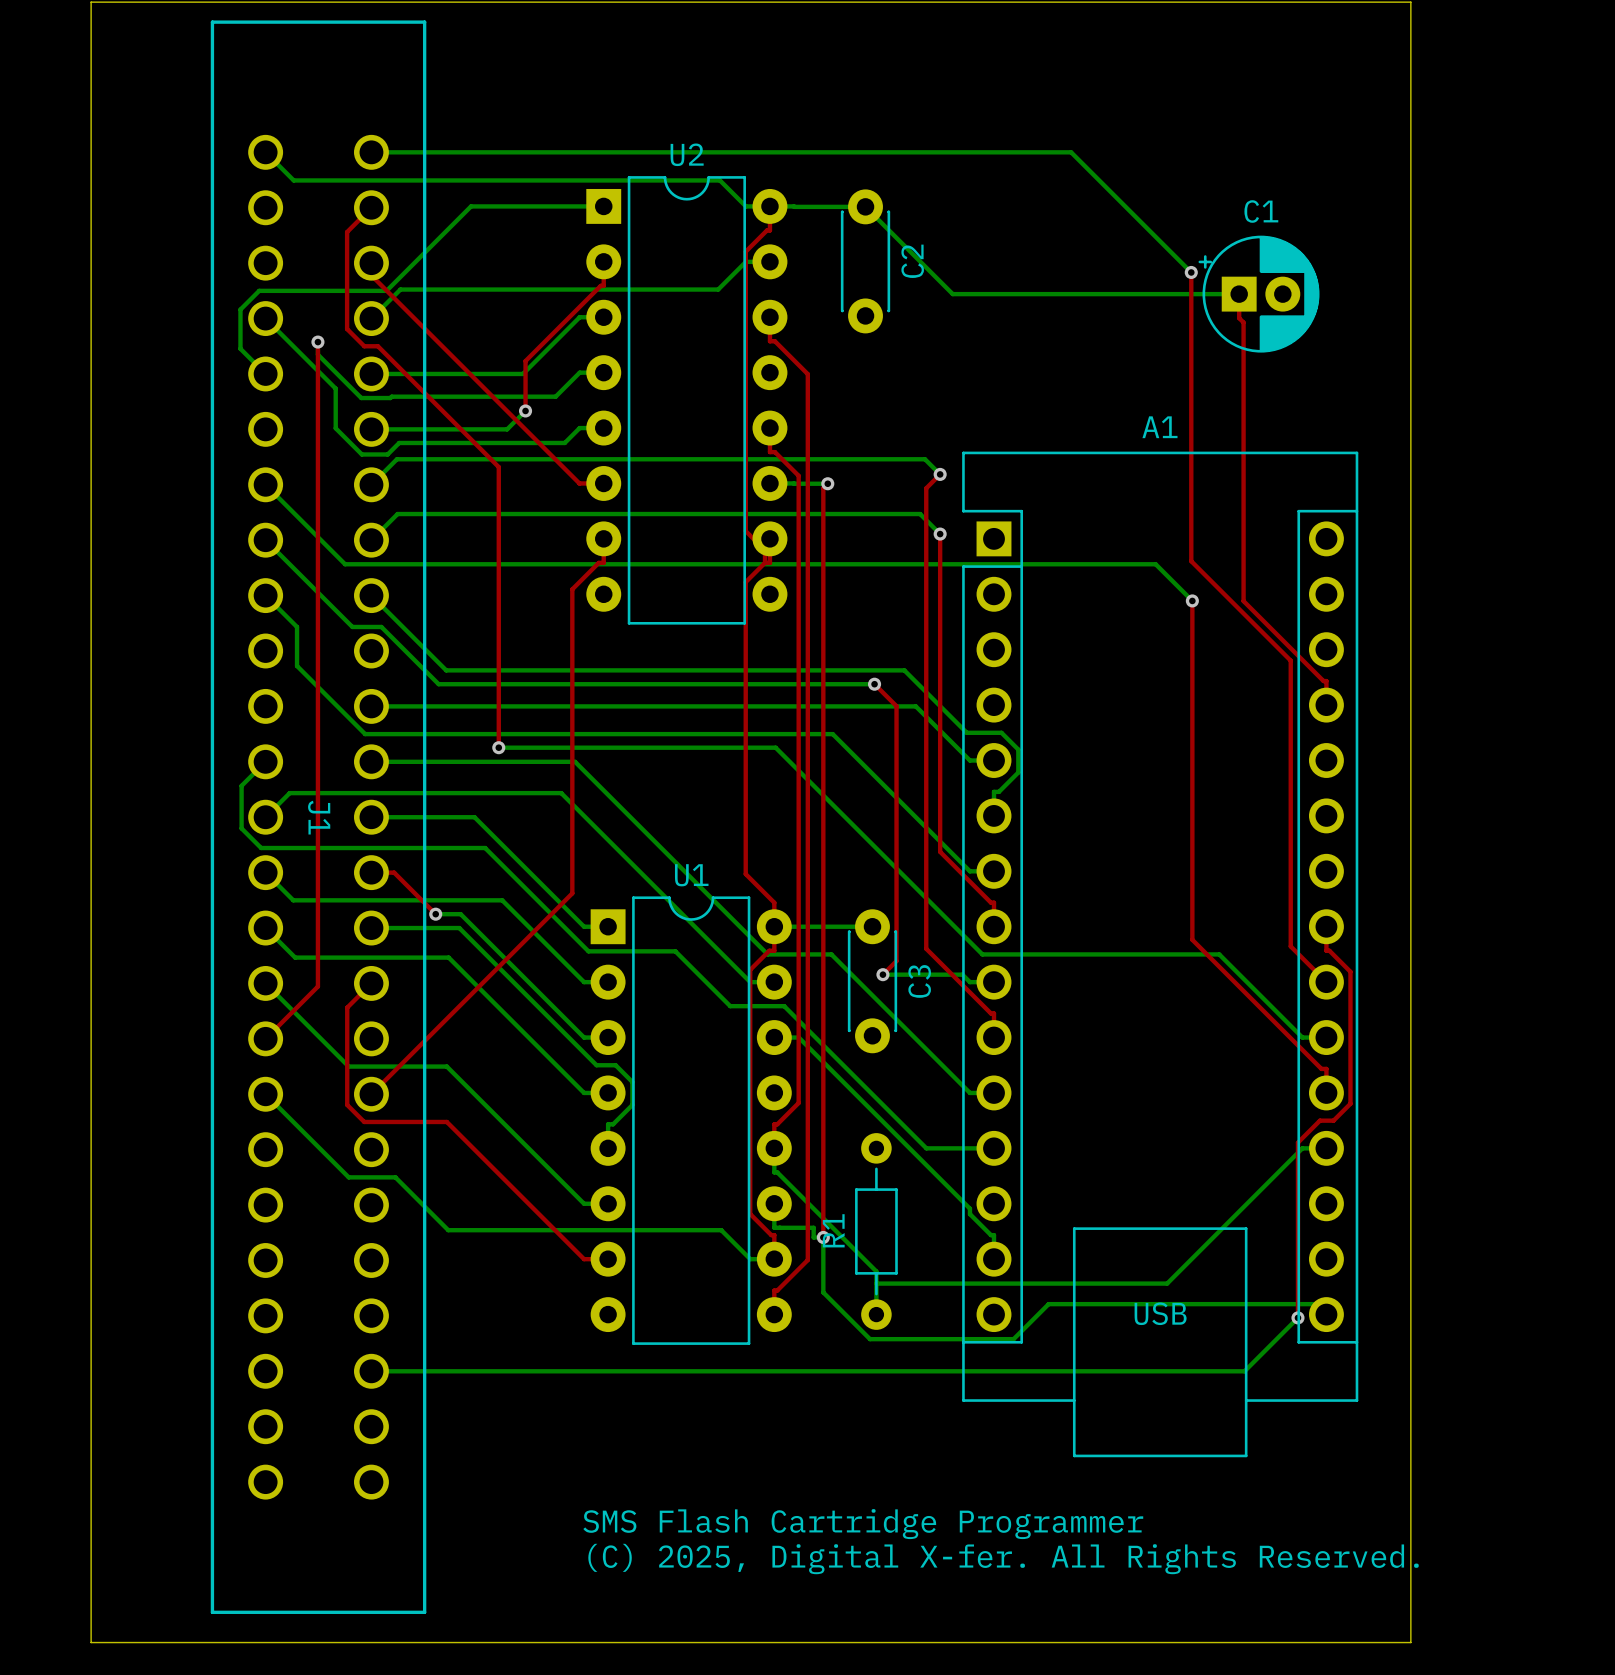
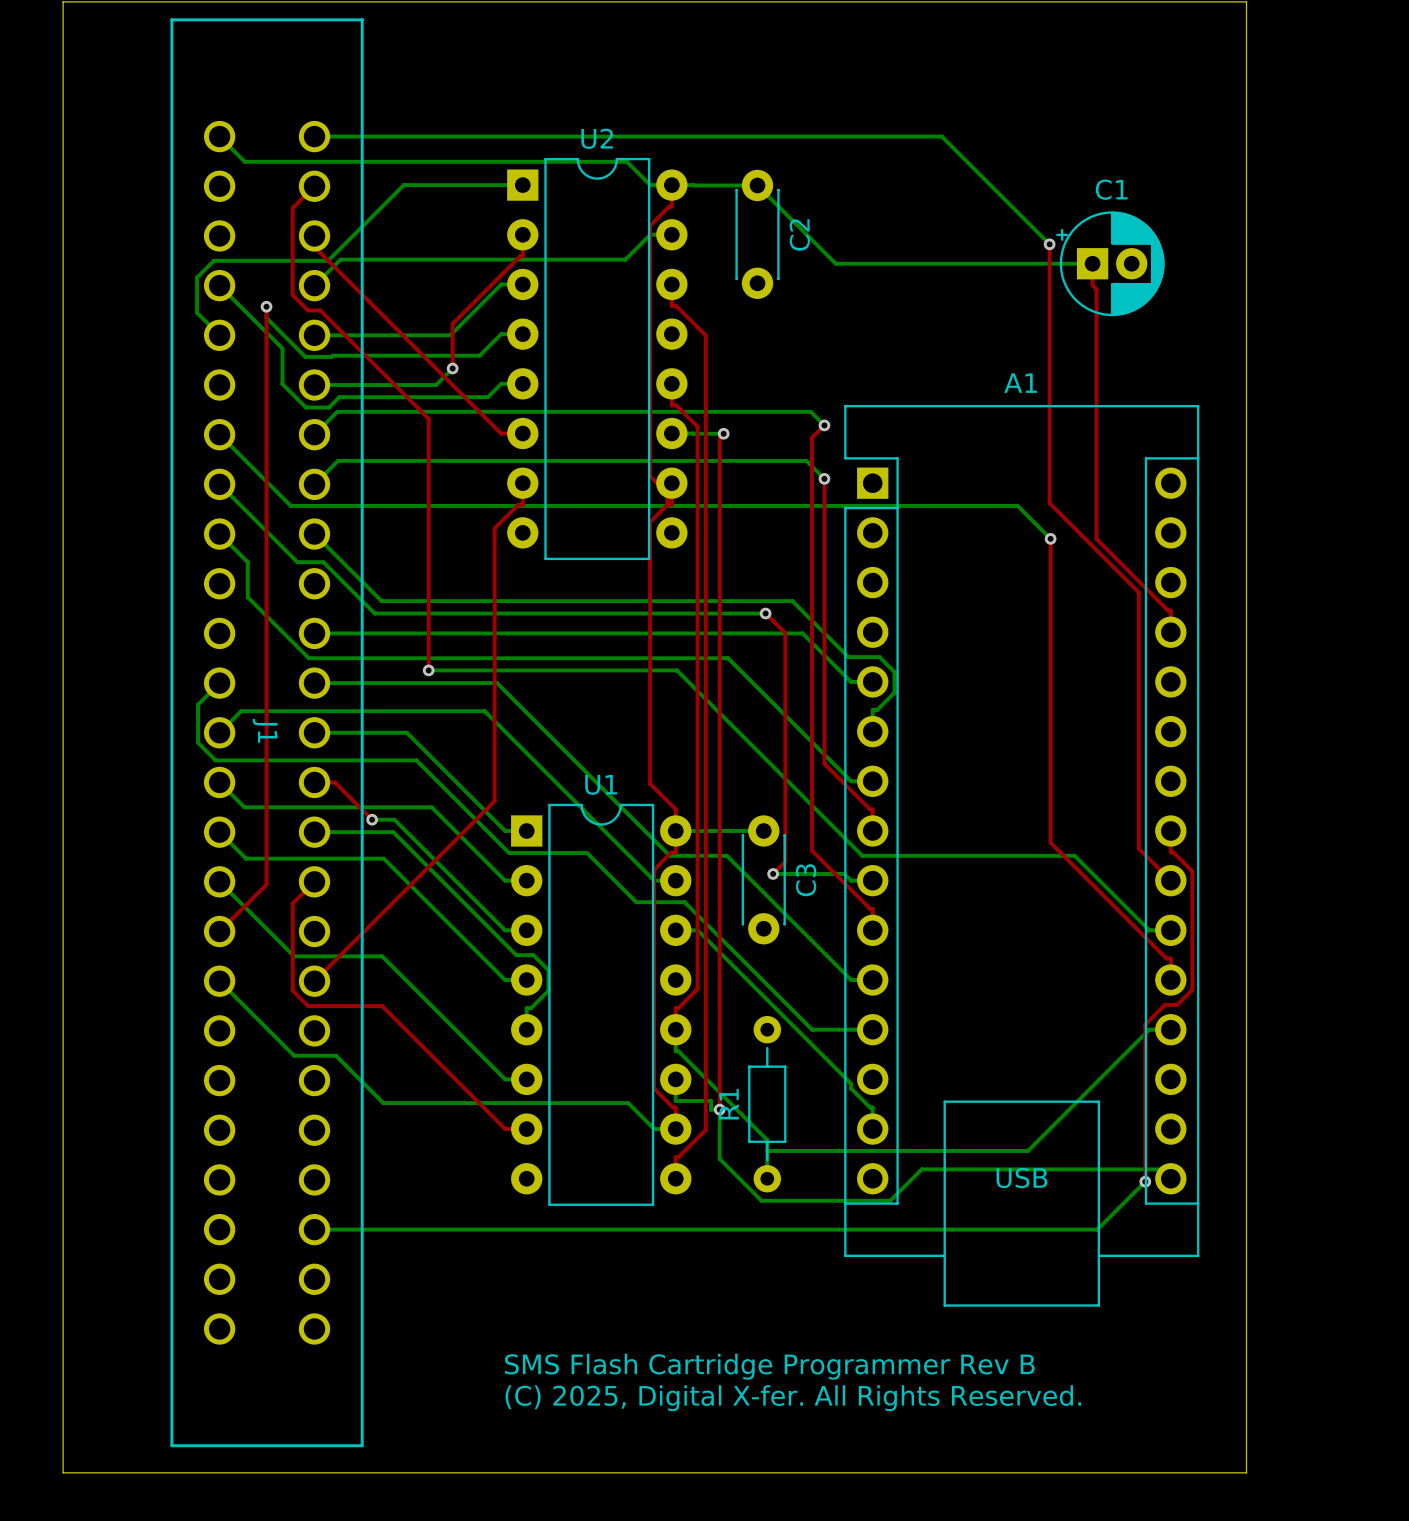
text: SMS Flash Cartridge Programmer (863, 1524) -> SMS Flash Cartridge Programmer Rev B (769, 1366)

